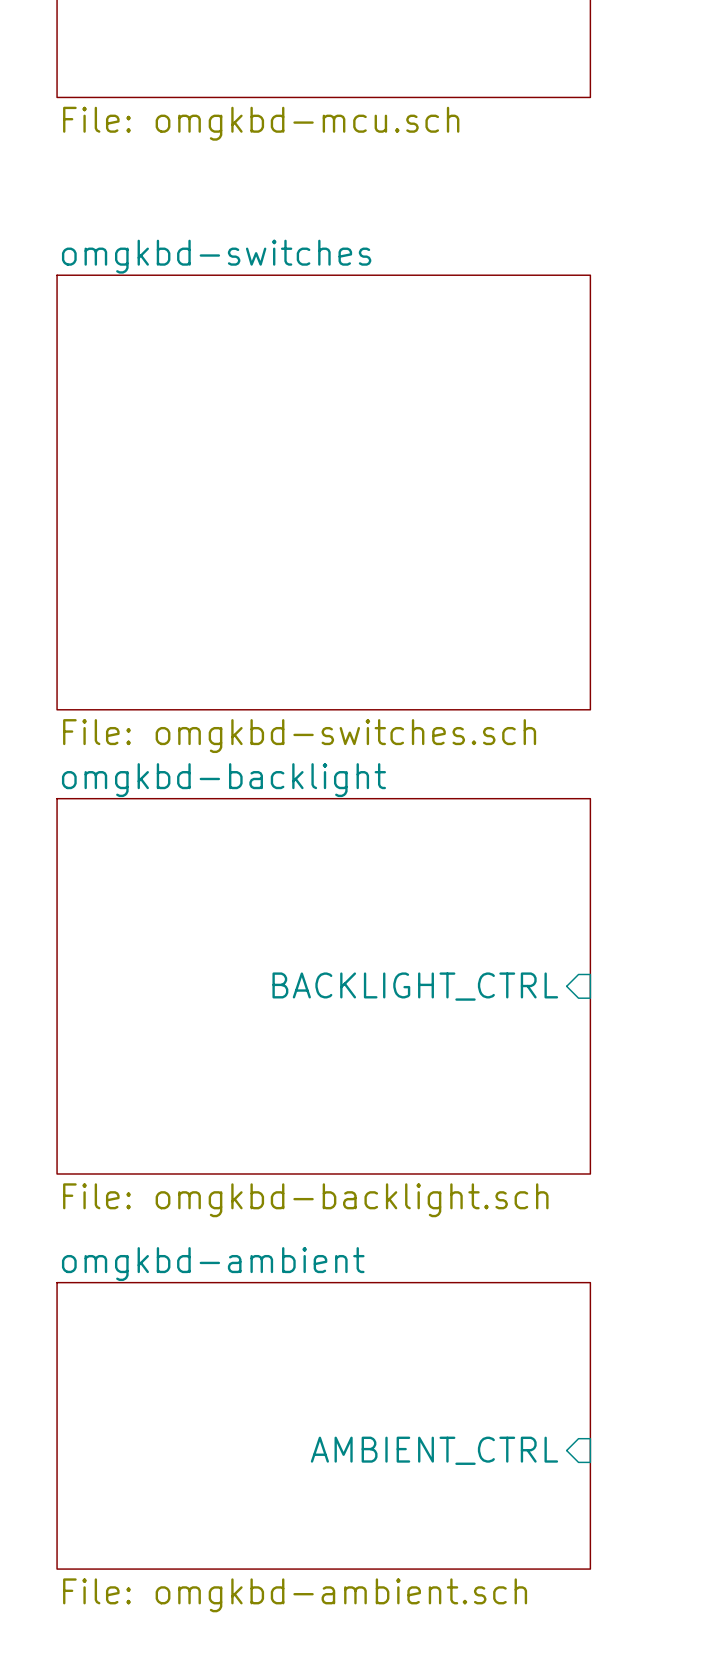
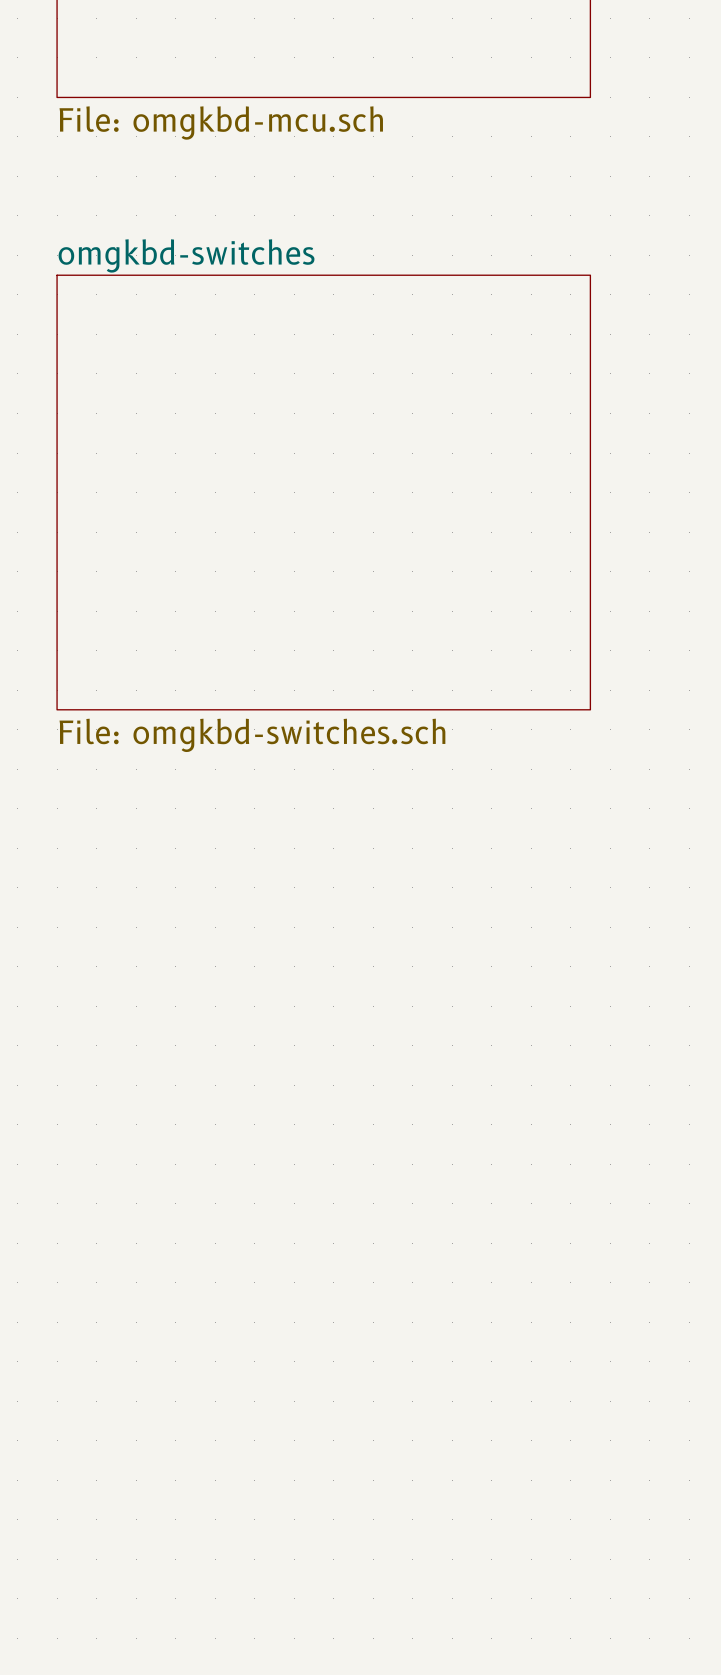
sheet omgkbd-backlight: File: omgkbd-backlight.sch (323, 986) -> none
sheet pin: BACKLIGHT_CTRL (415, 986) -> none
sheet omgkbd-ambient: File: omgkbd-ambient.sch (323, 1425) -> none
sheet pin: AMBIENT_CTRL (434, 1450) -> none

